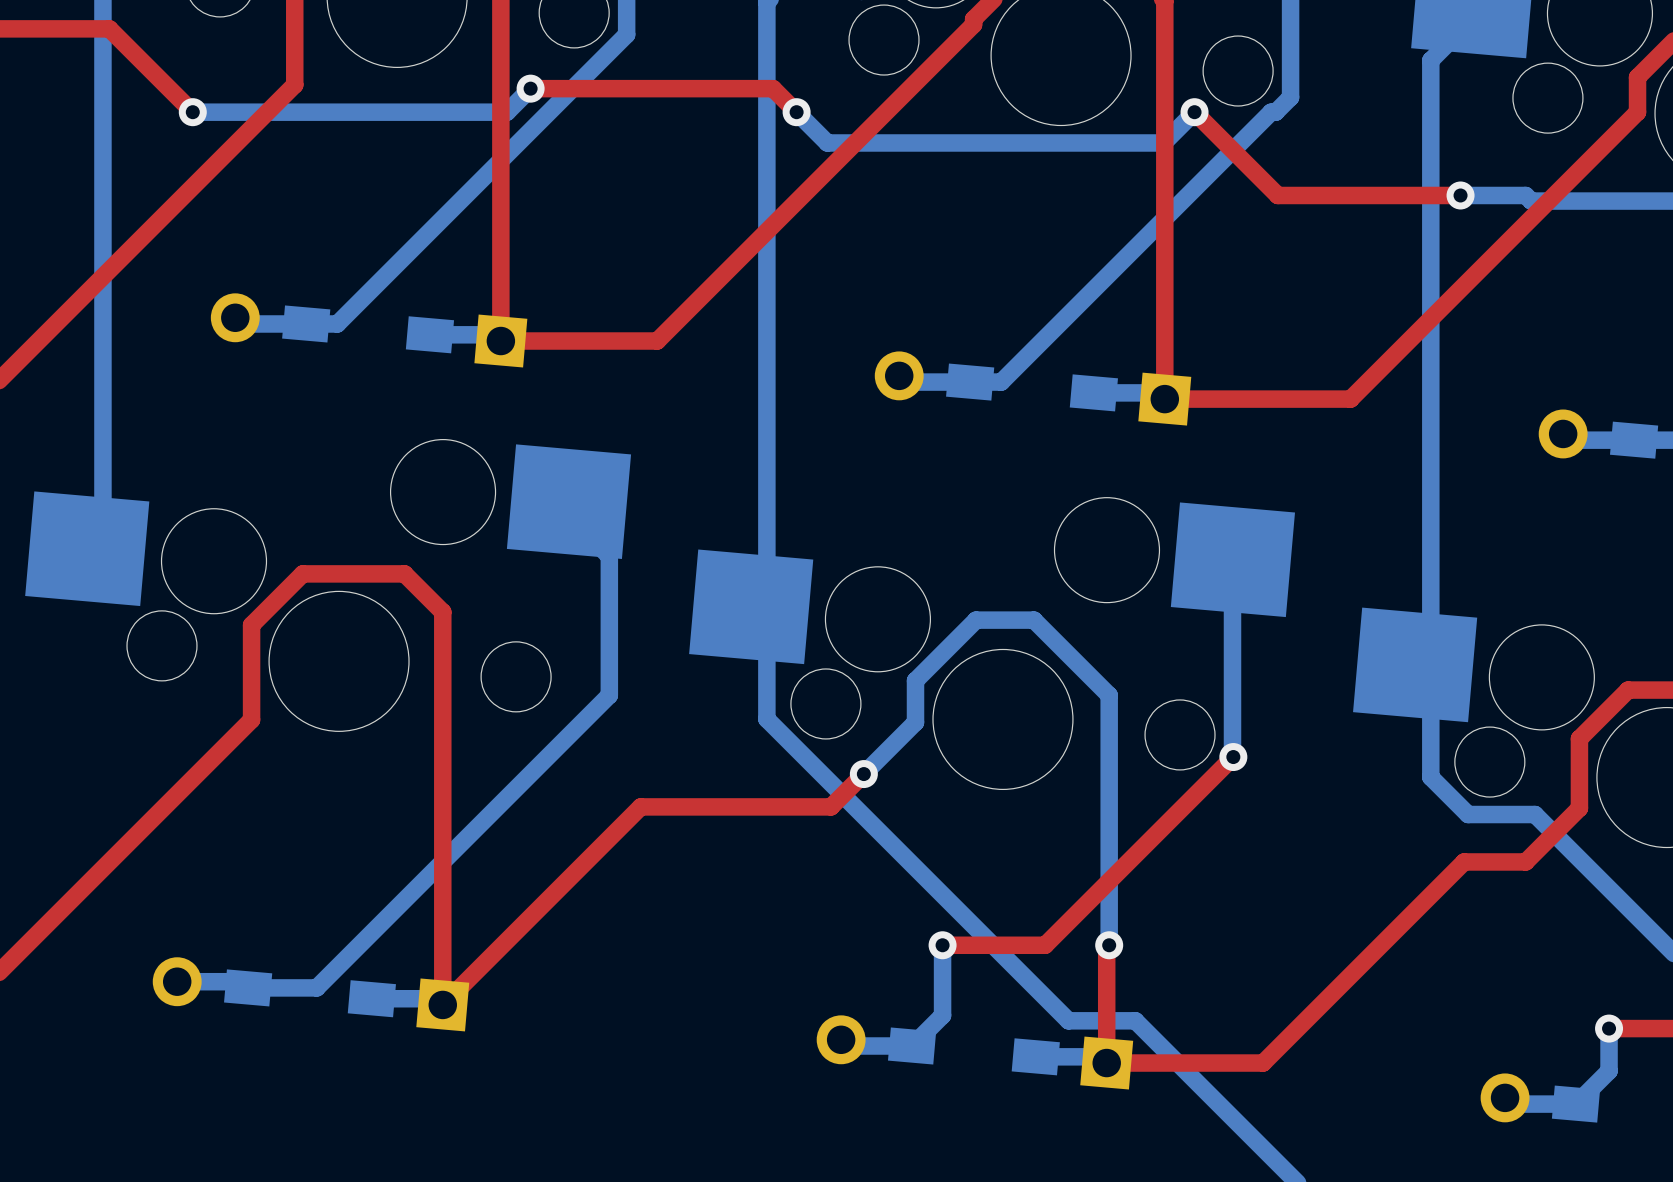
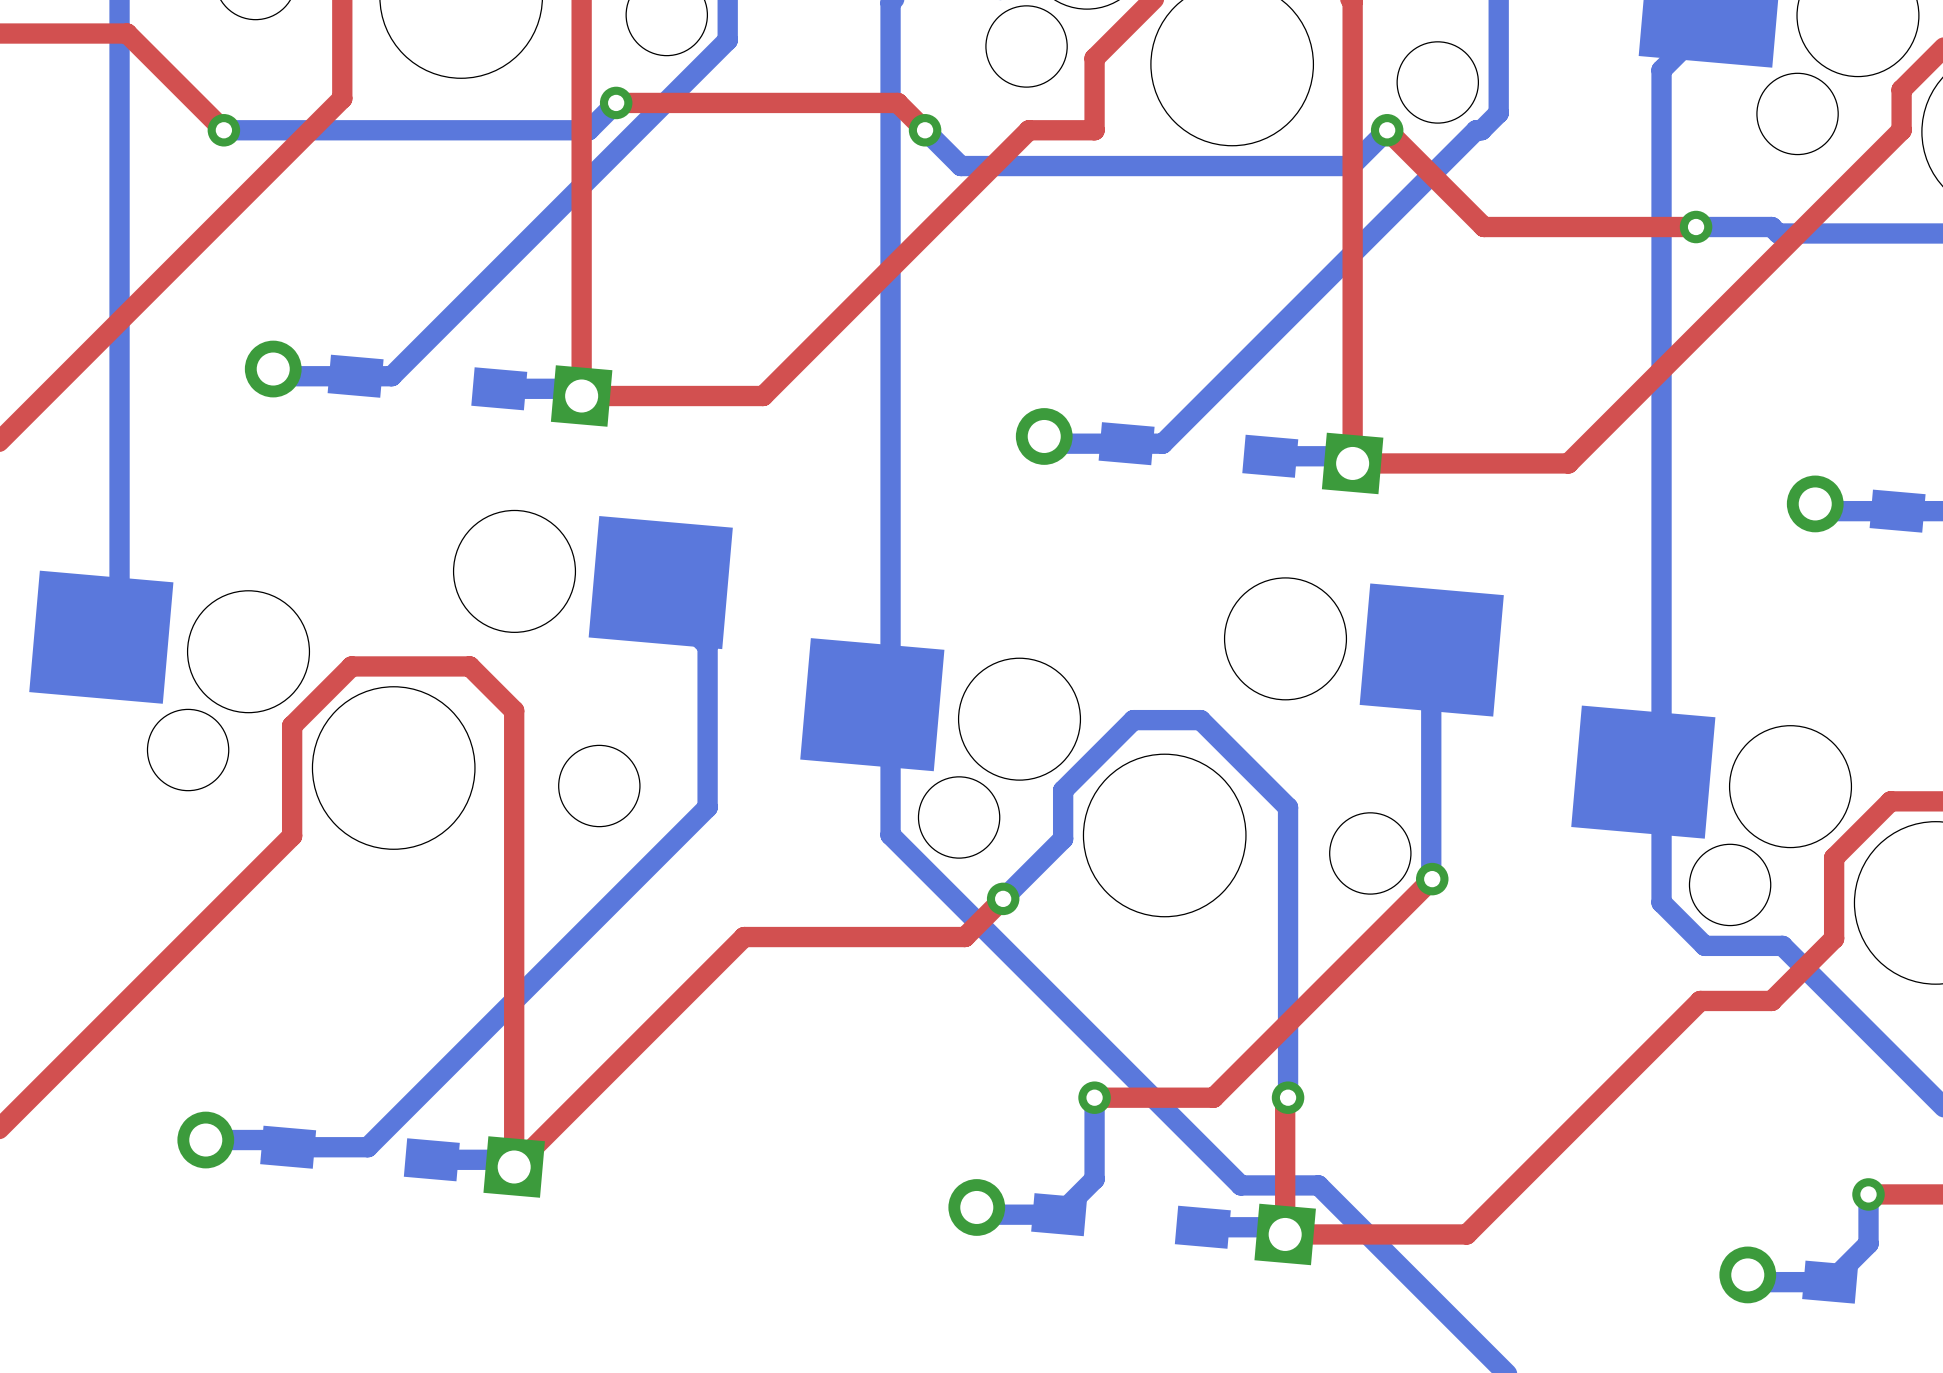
top track: (973, 19) (973, 24) (886, 112) -> (1130, 22) (1094, 58) (1094, 130) (1028, 130)

